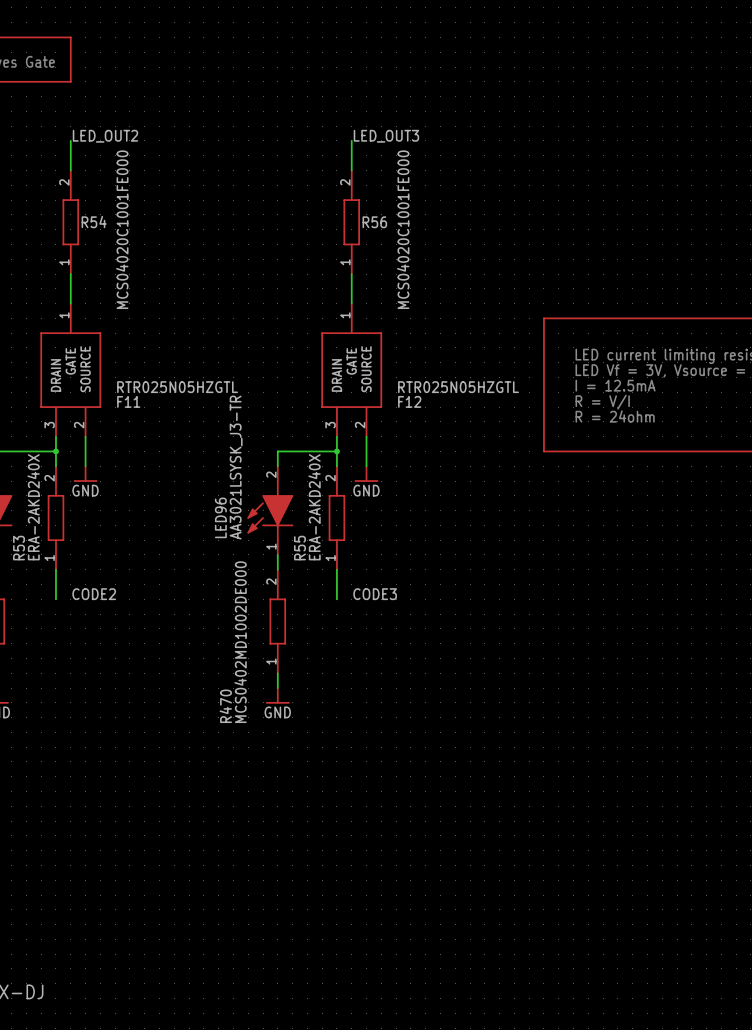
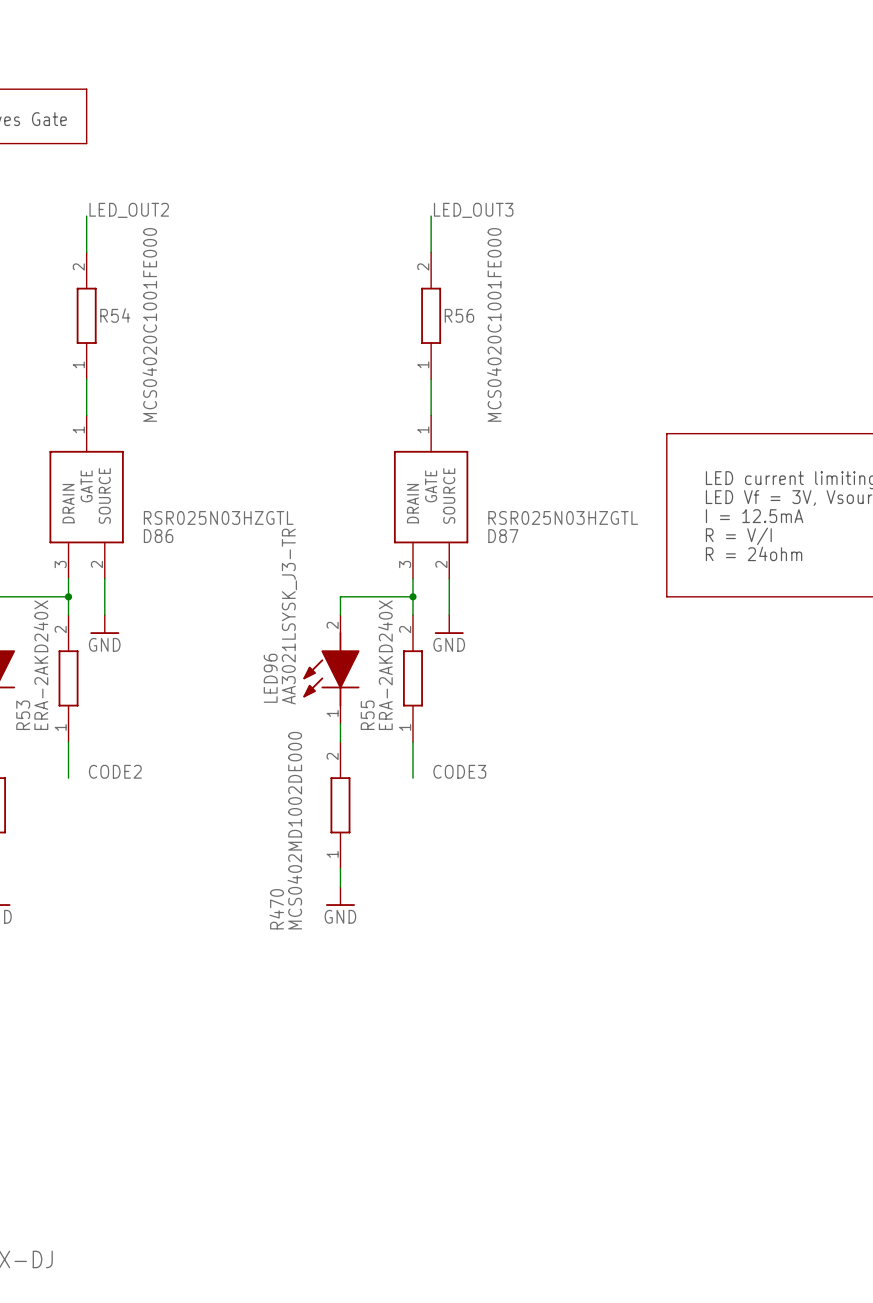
F11 value: RTR025N05HZGTL (177, 387) -> RSR025N03HZGTL (218, 517)
F12 value: RTR025N05HZGTL (458, 387) -> RSR025N03HZGTL (563, 517)
F11 name: F11 (128, 401) -> D86 (158, 536)
F12 name: F12 (409, 401) -> D87 (503, 536)

